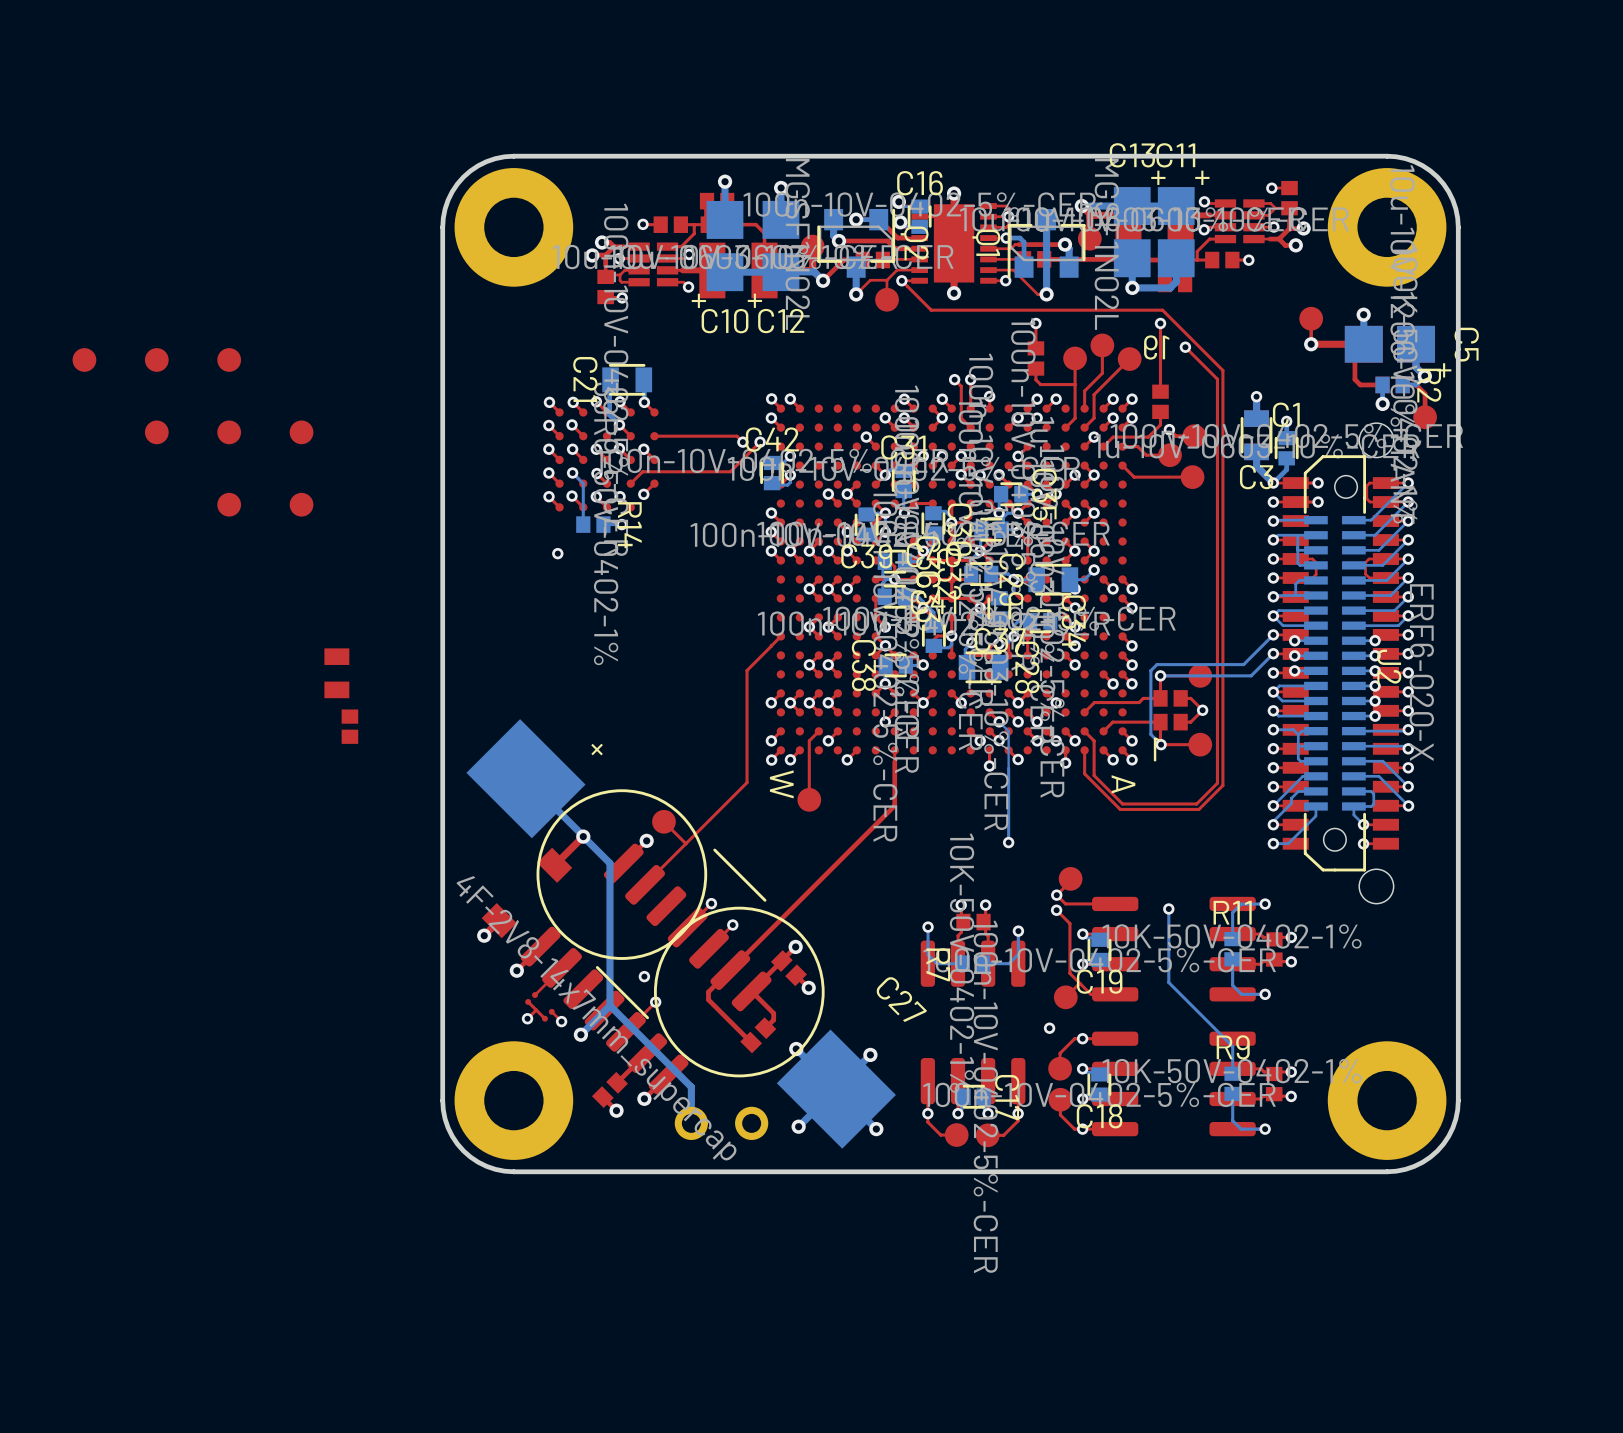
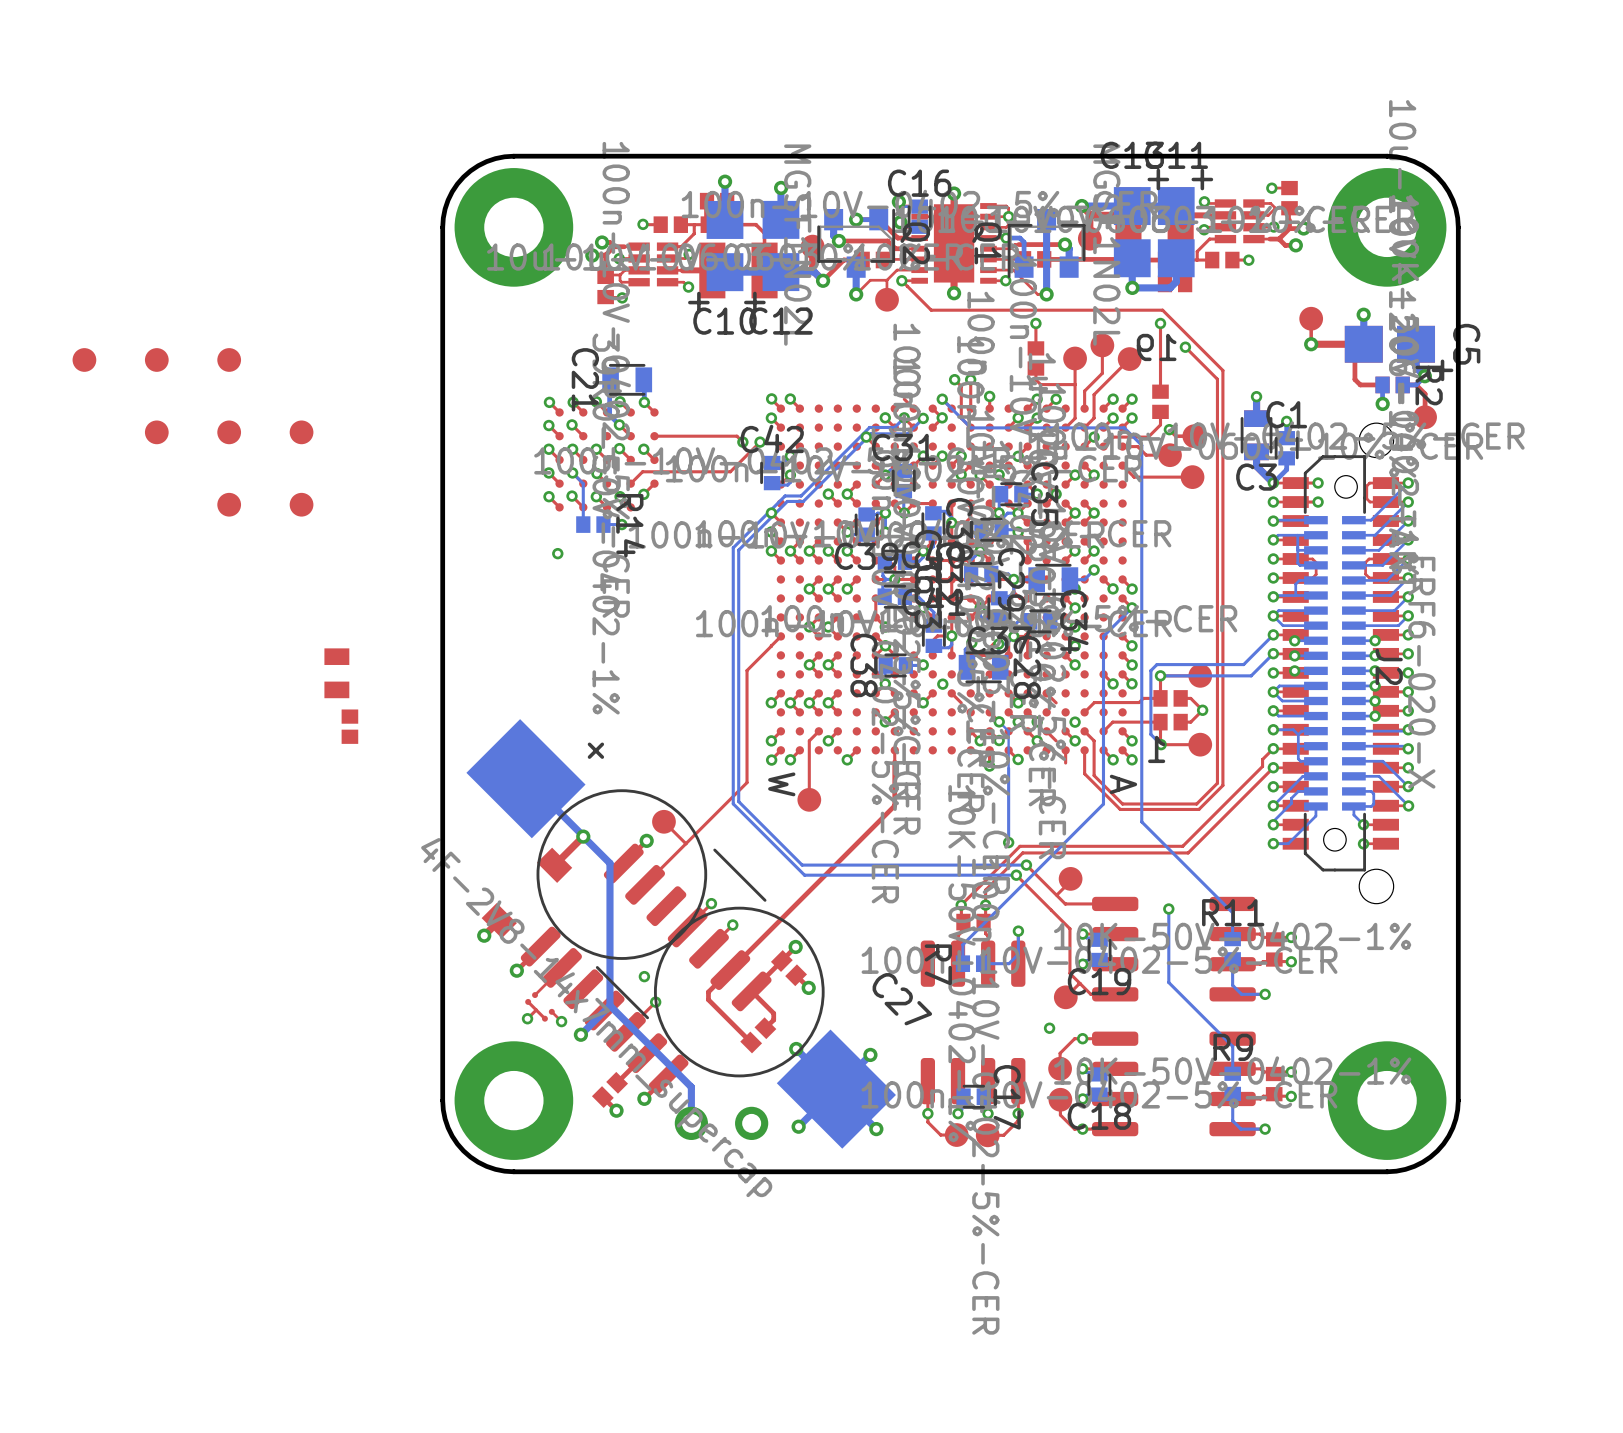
via position: (904, 399) -> (923, 418)
bottom track: none -> (903, 418) (894, 427) (869, 427) (801, 495) (785, 495) (733, 547) (733, 803) (804, 875) (1016, 875)
bottom track: none -> (923, 418) (907, 433) (871, 433) (803, 501) (787, 501) (738, 550) (738, 801) (802, 865) (1026, 865)
bottom track: none -> (1131, 607) (1103, 636) (1103, 804) (962, 944) (962, 963)
via position: (961, 702) -> (942, 684)
via: (1056, 702) -> none
via: none -> (1075, 722)
via: (1056, 740) -> none
top track: none -> (1273, 748) (1262, 759) (1262, 766) (1182, 846) (1019, 846) (961, 905)
via: (1065, 763) -> none
top track: none -> (1273, 767) (1188, 852) (1022, 852) (985, 890) (985, 905)
via: none -> (1026, 865)
via: none -> (1016, 875)
via: (1056, 895) -> none
bottom track: (1265, 904) (1241, 904) (1232, 912) -> (942, 399) (970, 427) (1124, 427) (1141, 445) (1141, 821) (1232, 912)
via: (1265, 904) -> none
top track: (1056, 910) (1069, 923) (1069, 928) -> (1016, 875) (1069, 928)
via: (1056, 910) -> none
bottom track: (928, 927) (928, 954) (936, 963) (960, 963) -> none
via: (928, 927) -> none

